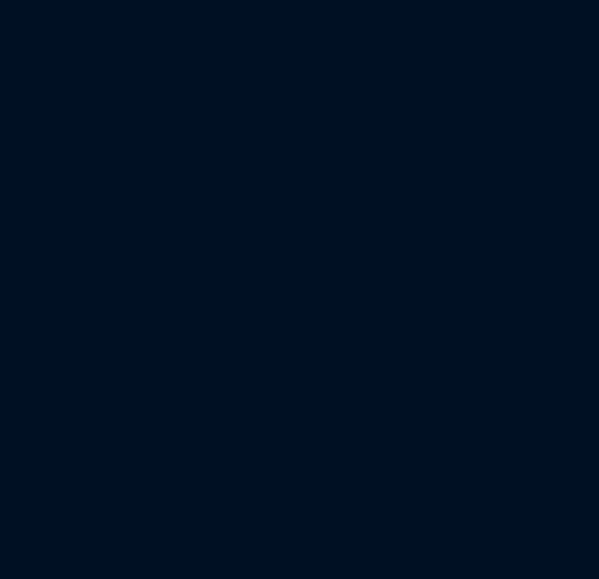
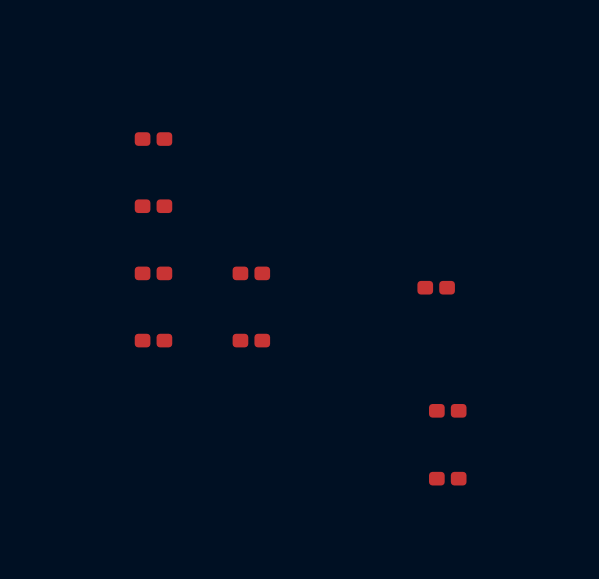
part: none -> (153, 139)
part: none -> (153, 206)
part: none -> (153, 273)
part: none -> (251, 273)
part: none -> (436, 287)
part: none -> (153, 340)
part: none -> (251, 340)
part: none -> (447, 410)
part: none -> (447, 478)

